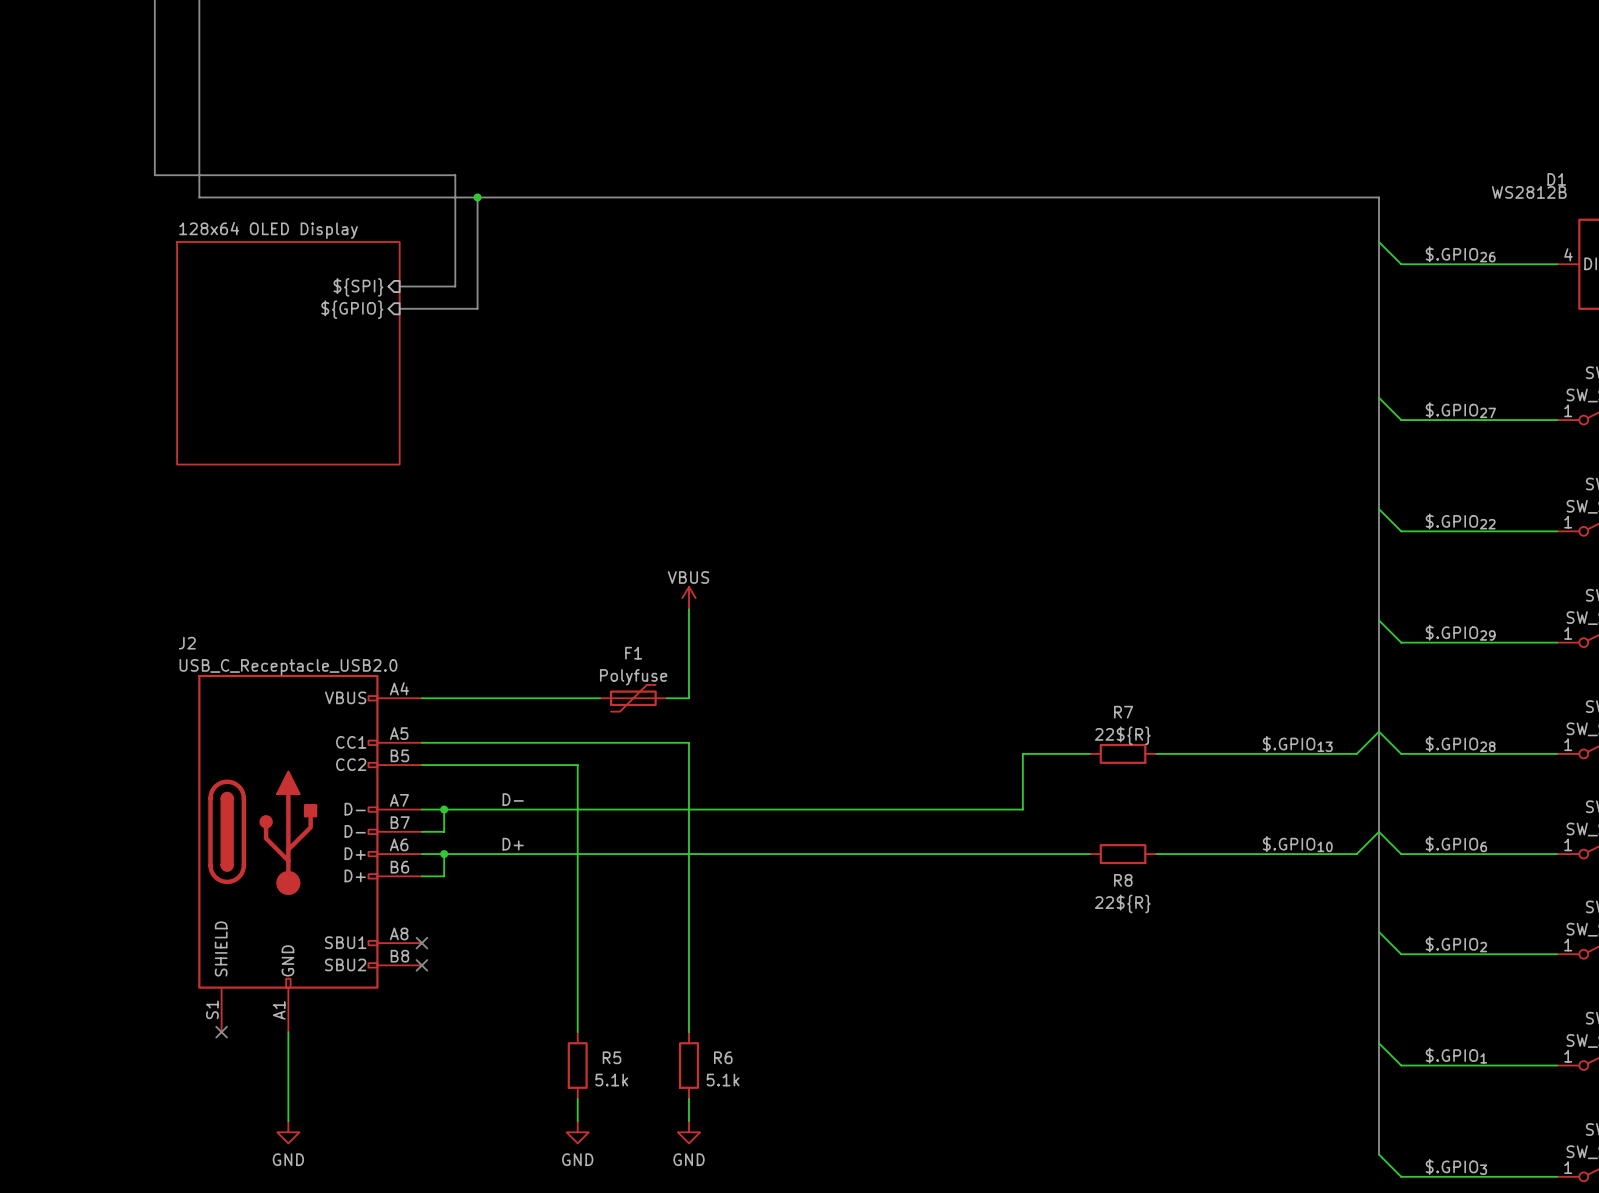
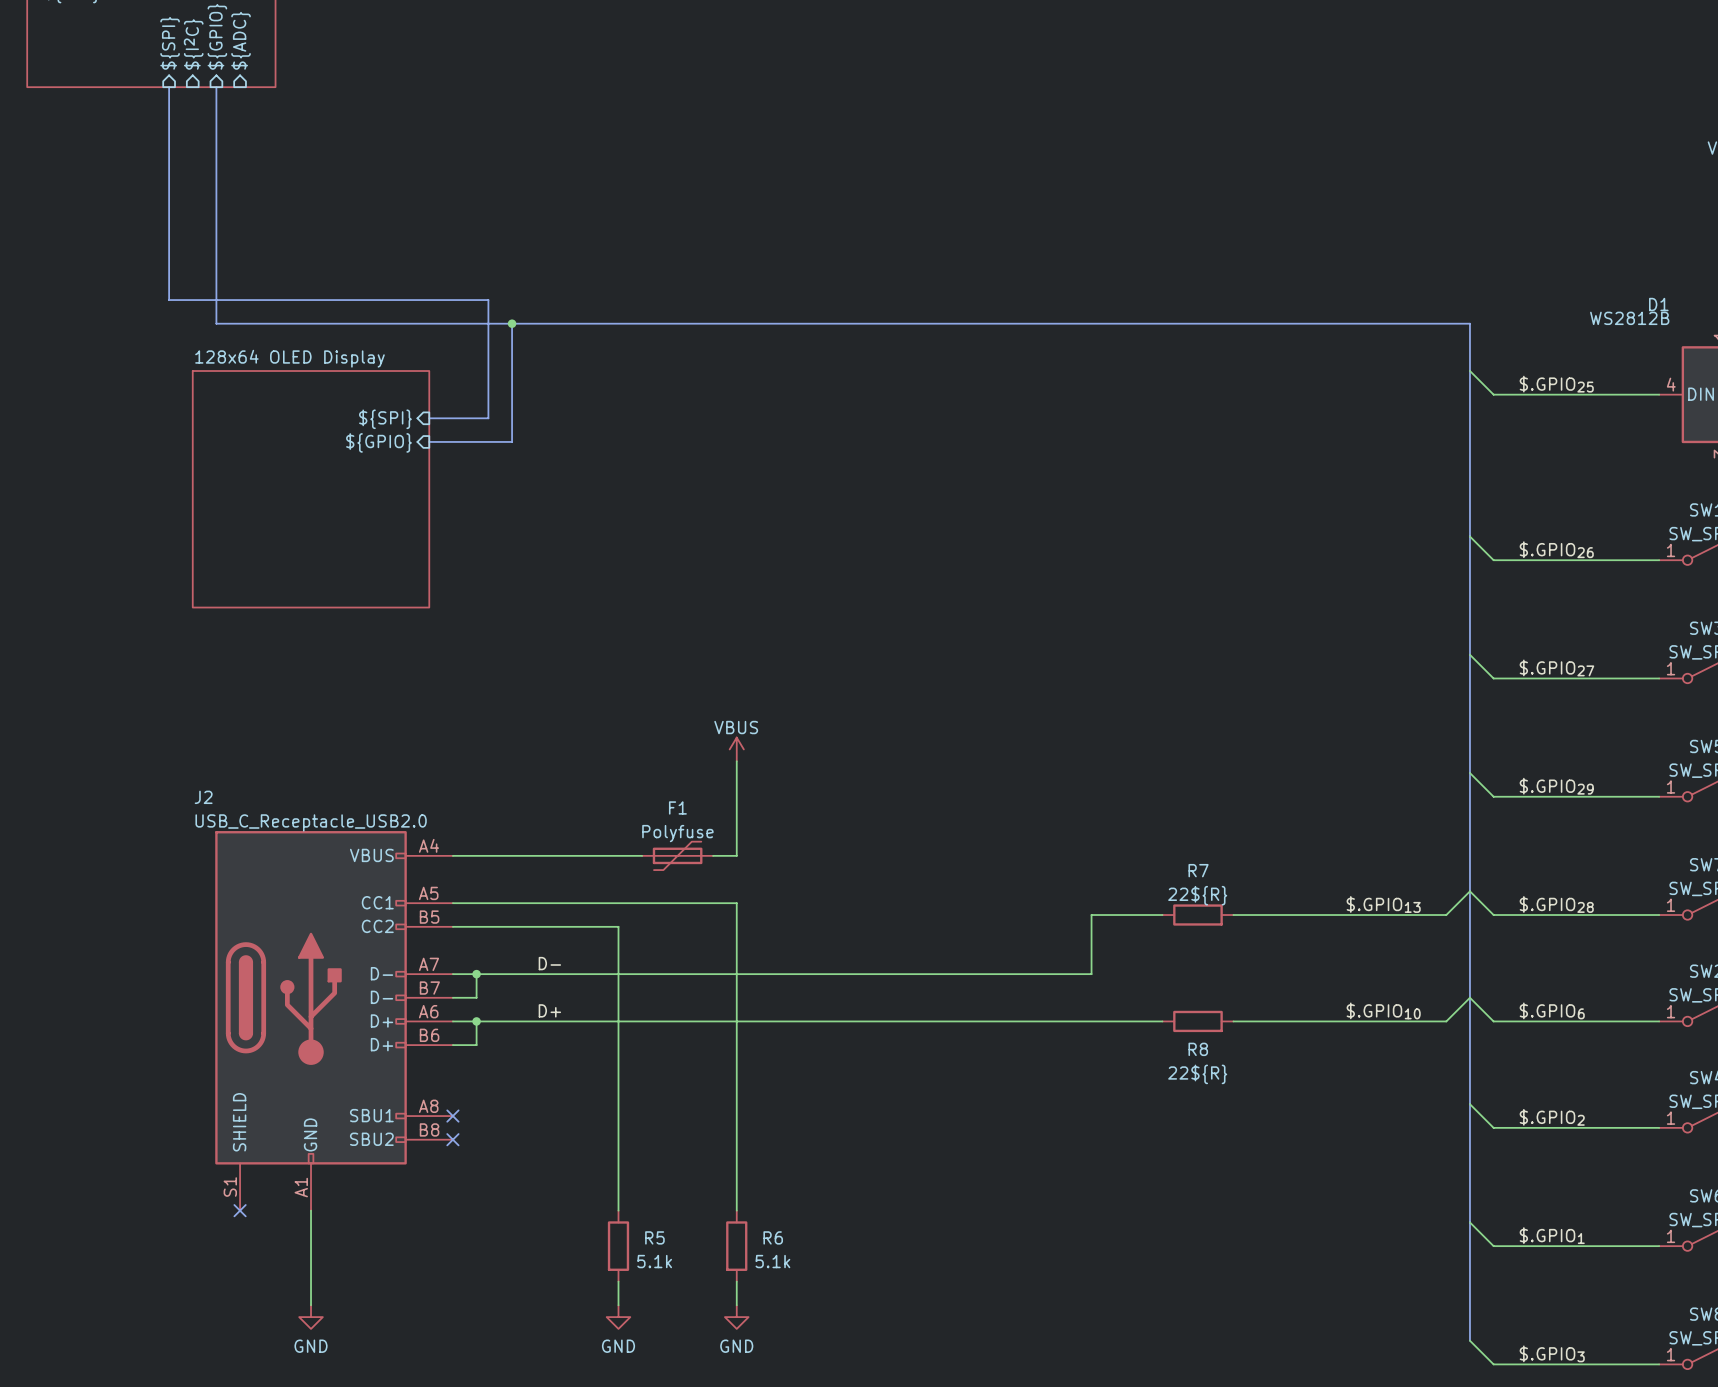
label: $.GPIO26 (1460, 254) -> $.GPIO25 (1556, 384)
label: $.GPIO27 (1460, 410) -> $.GPIO26 (1556, 549)
label: $.GPIO22 (1460, 521) -> $.GPIO27 (1556, 667)

